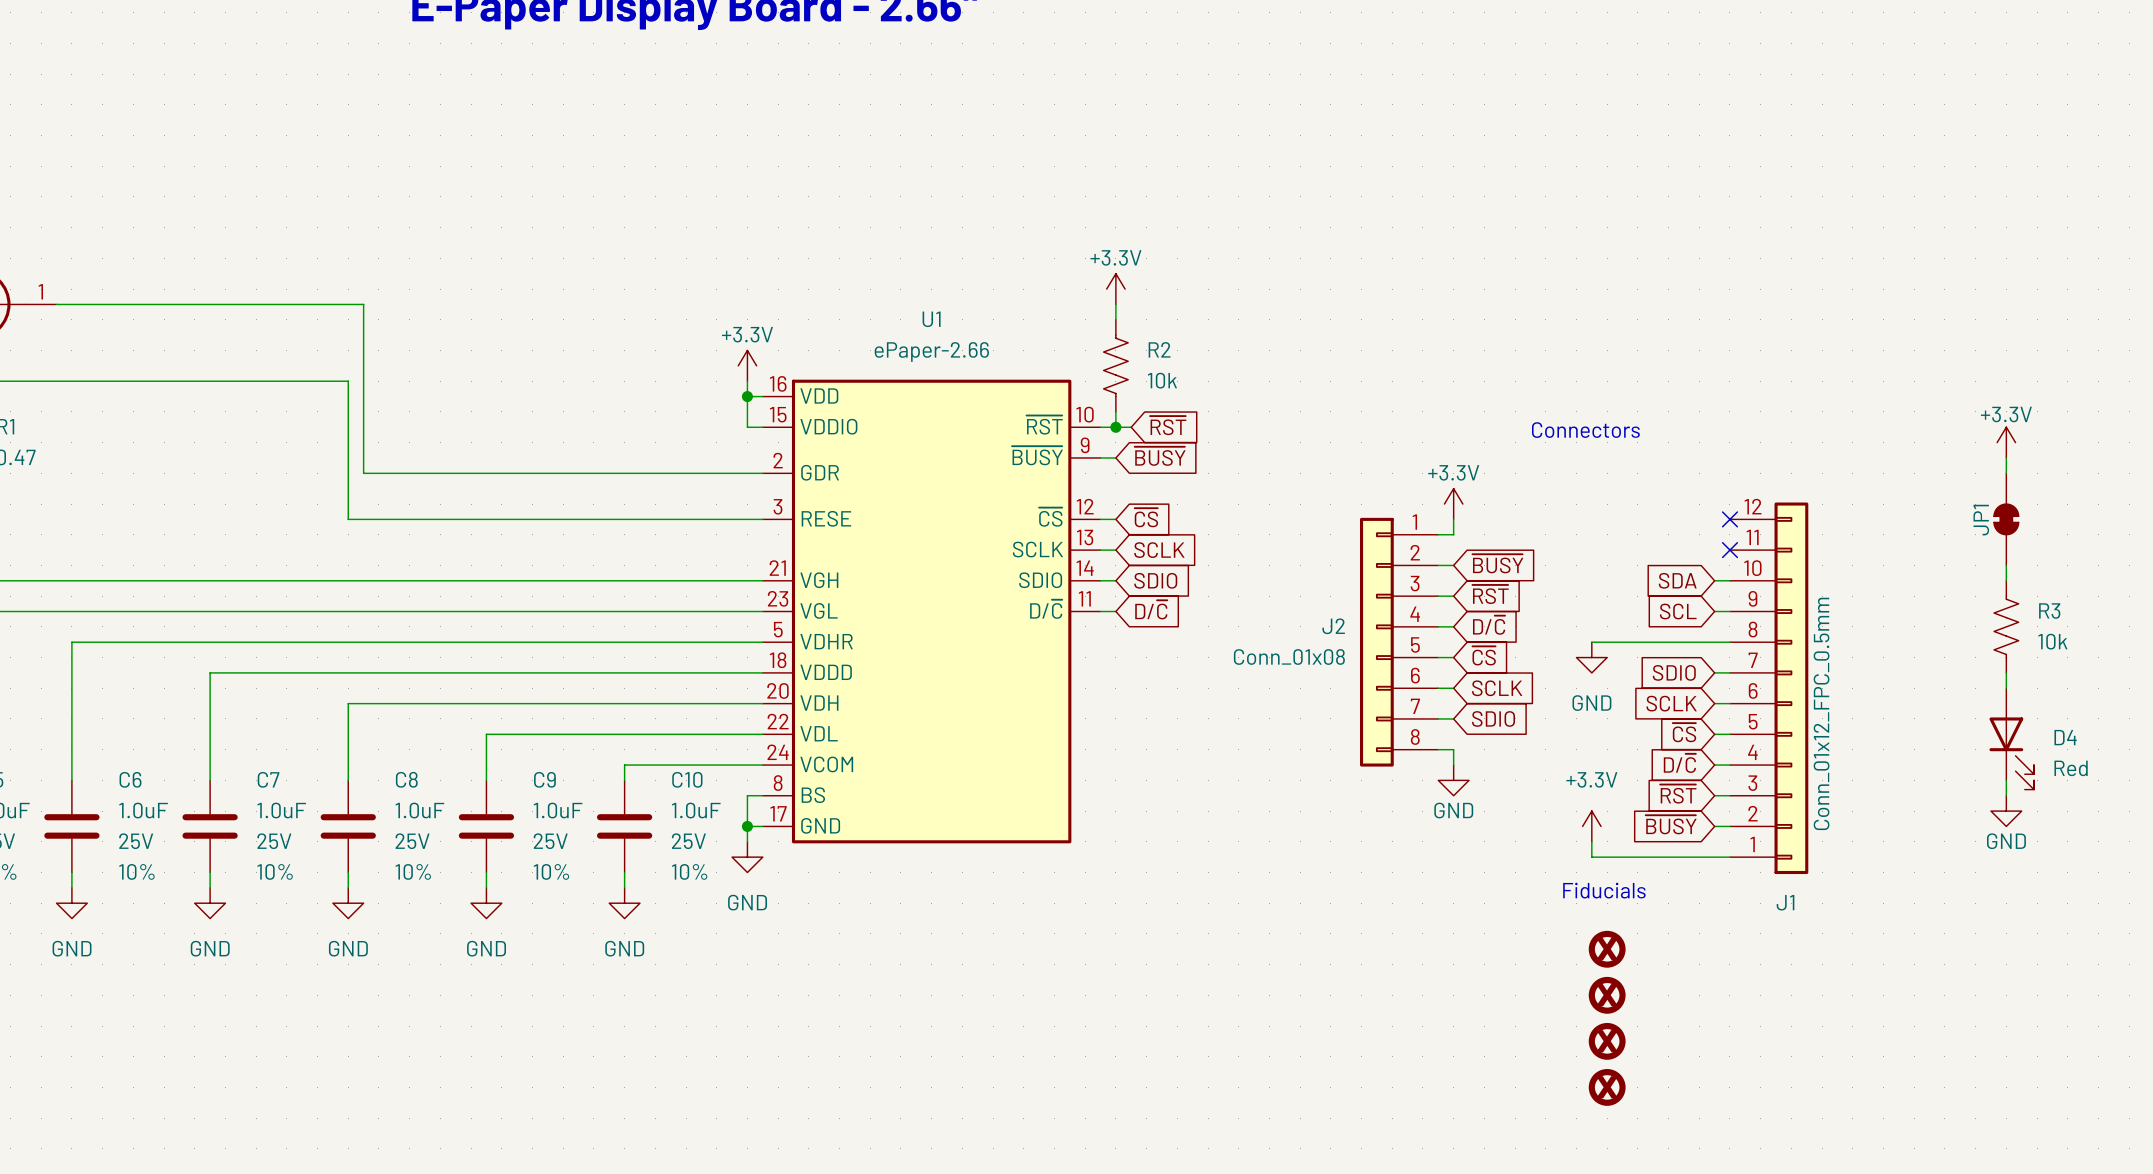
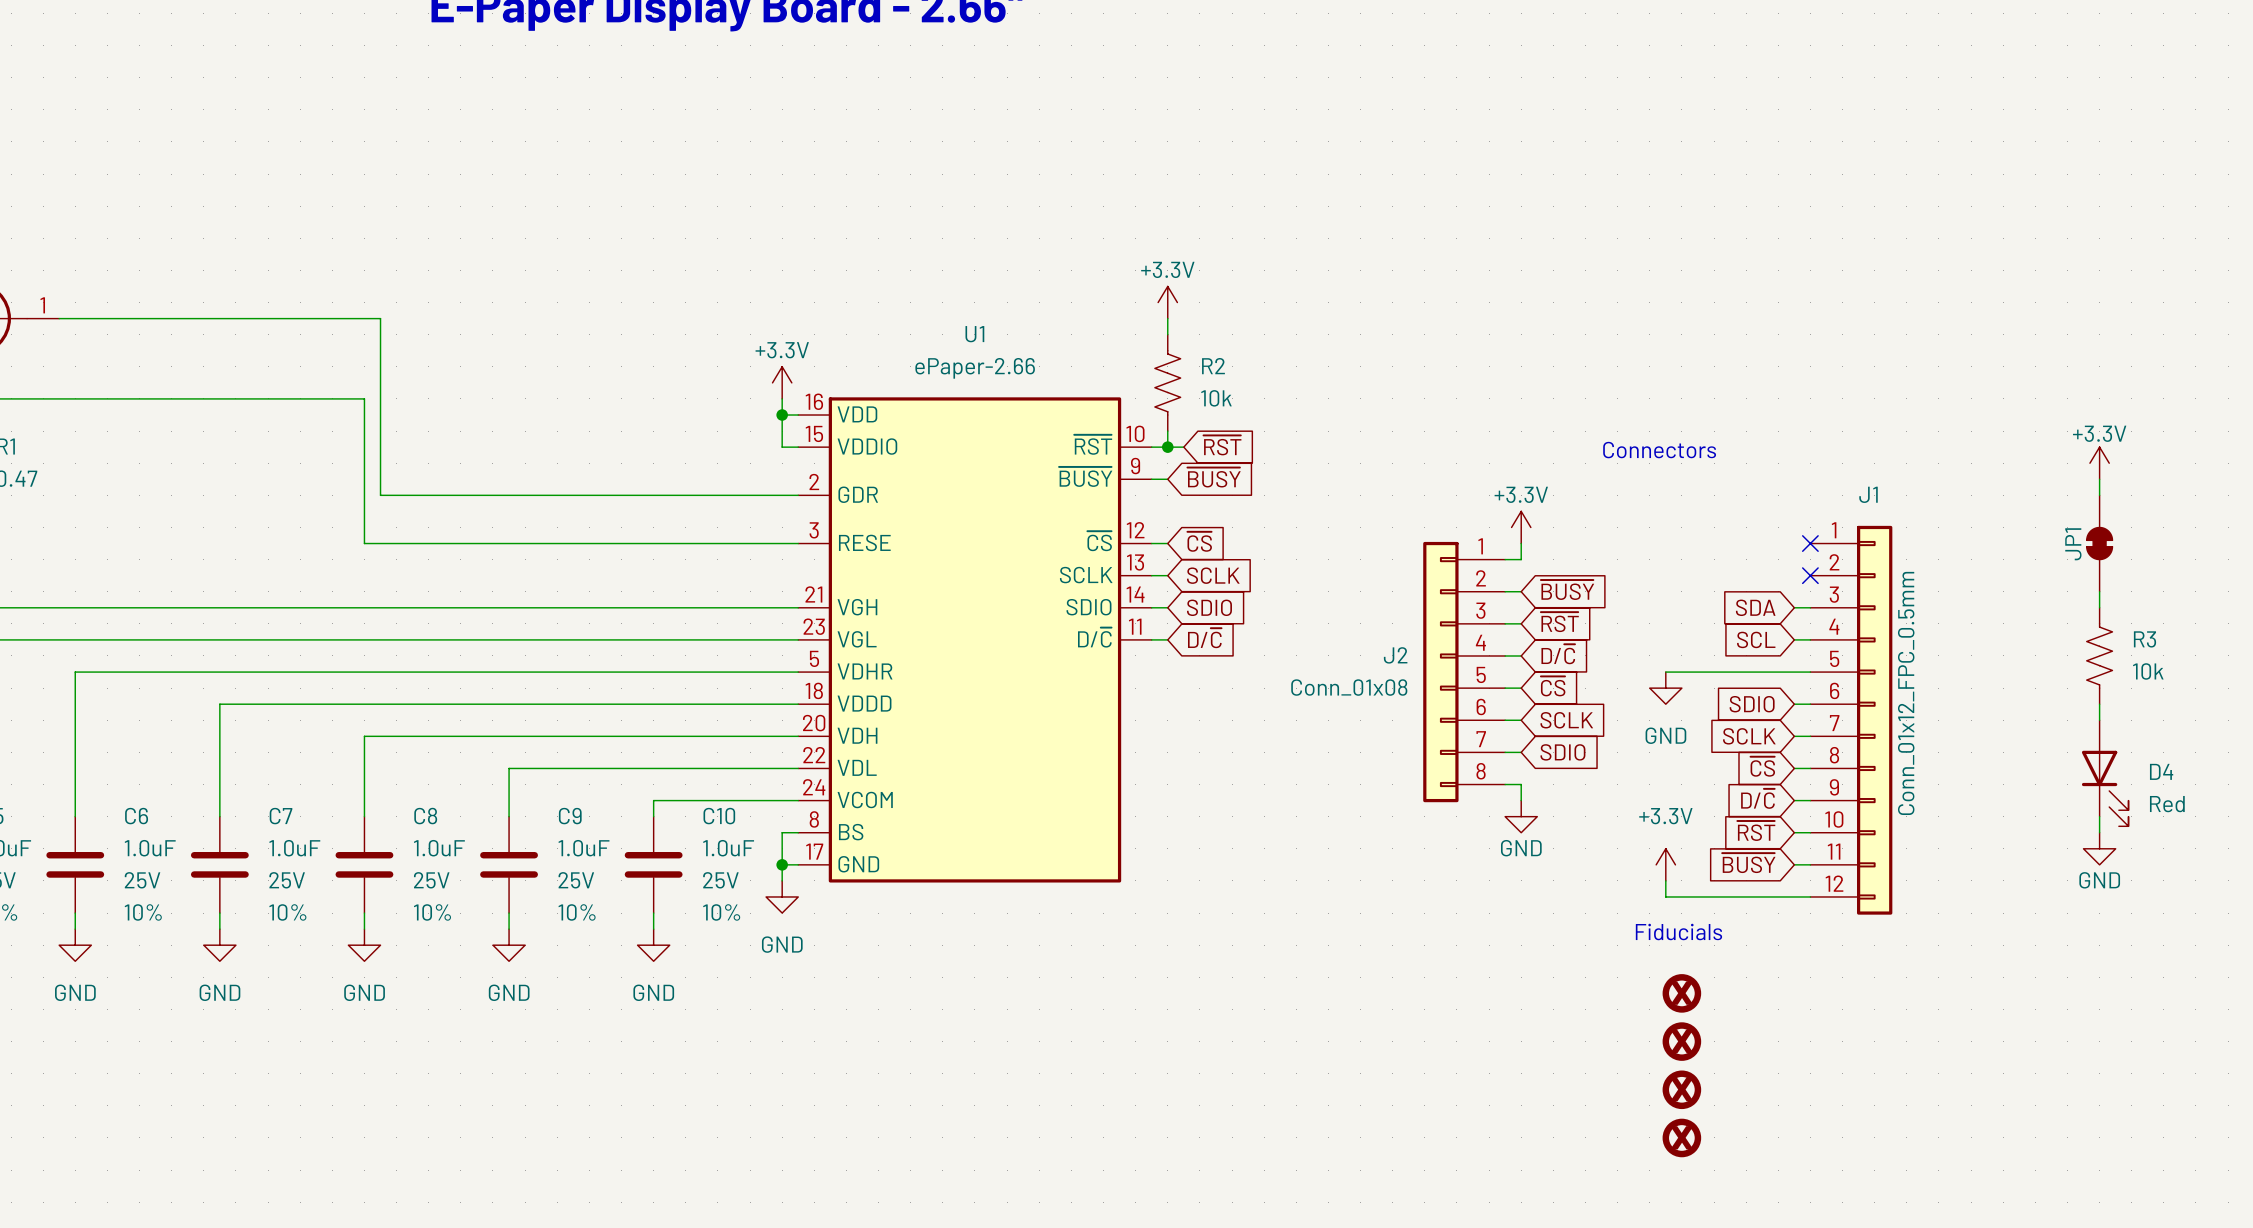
J1 flip: as is (1791, 688) -> up-down (1874, 720)

